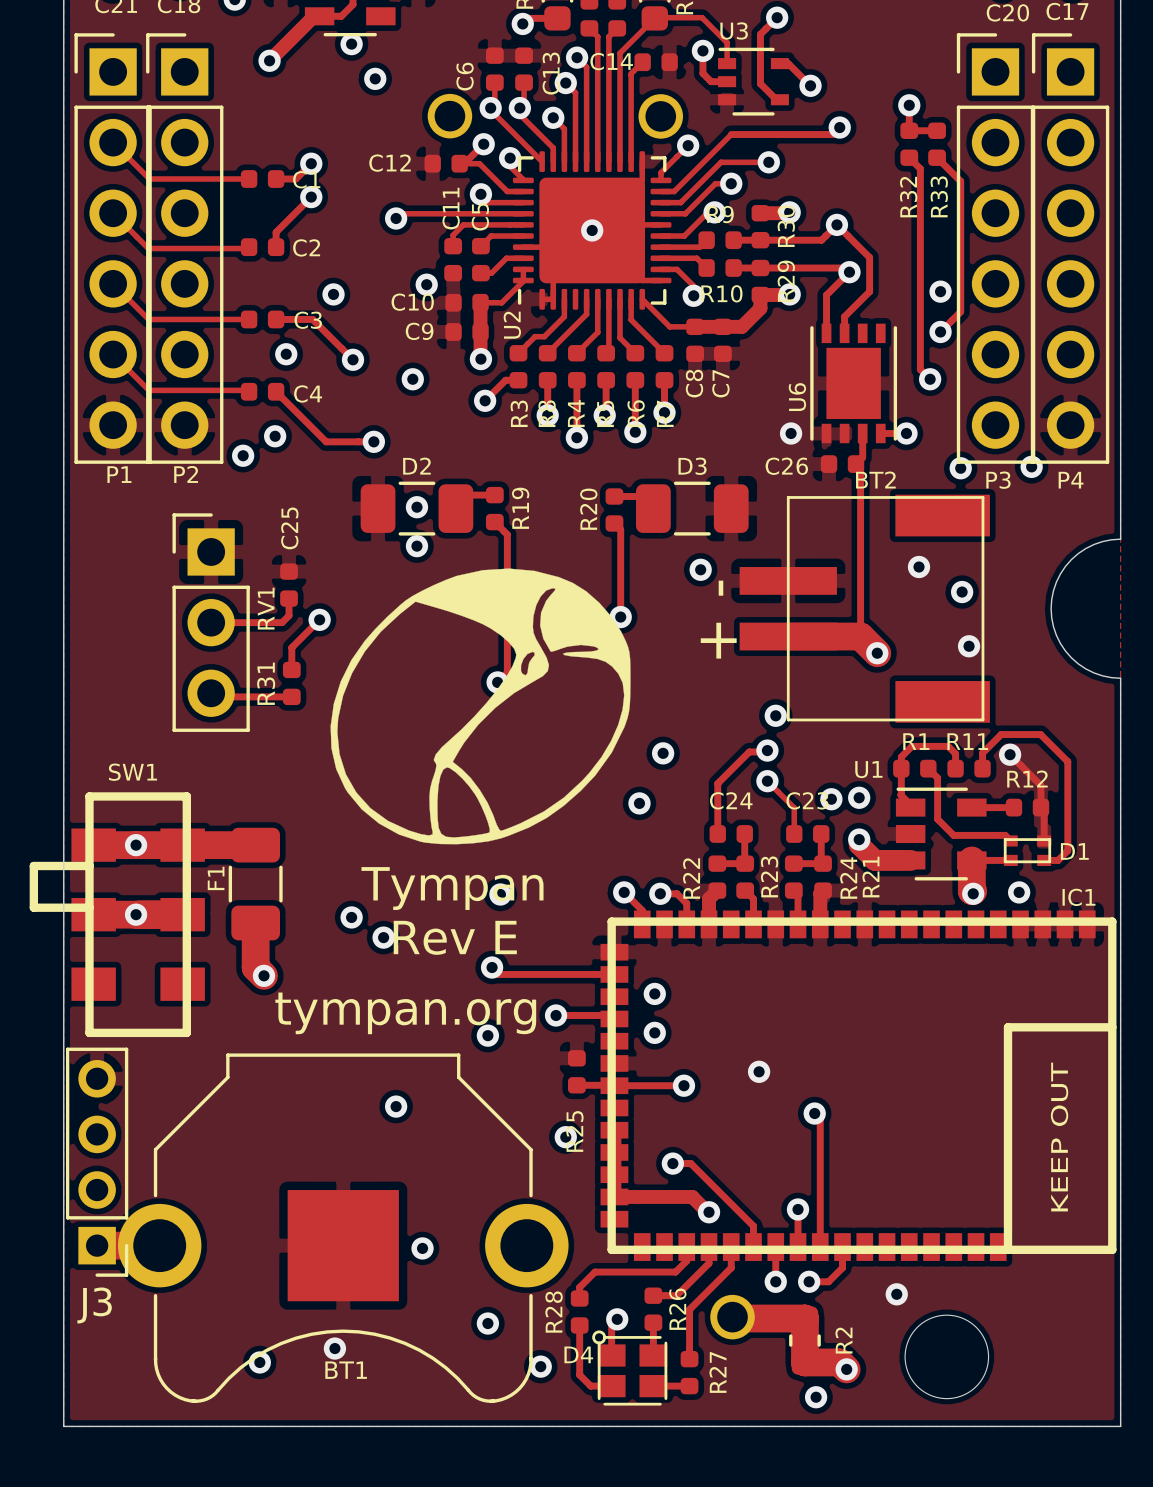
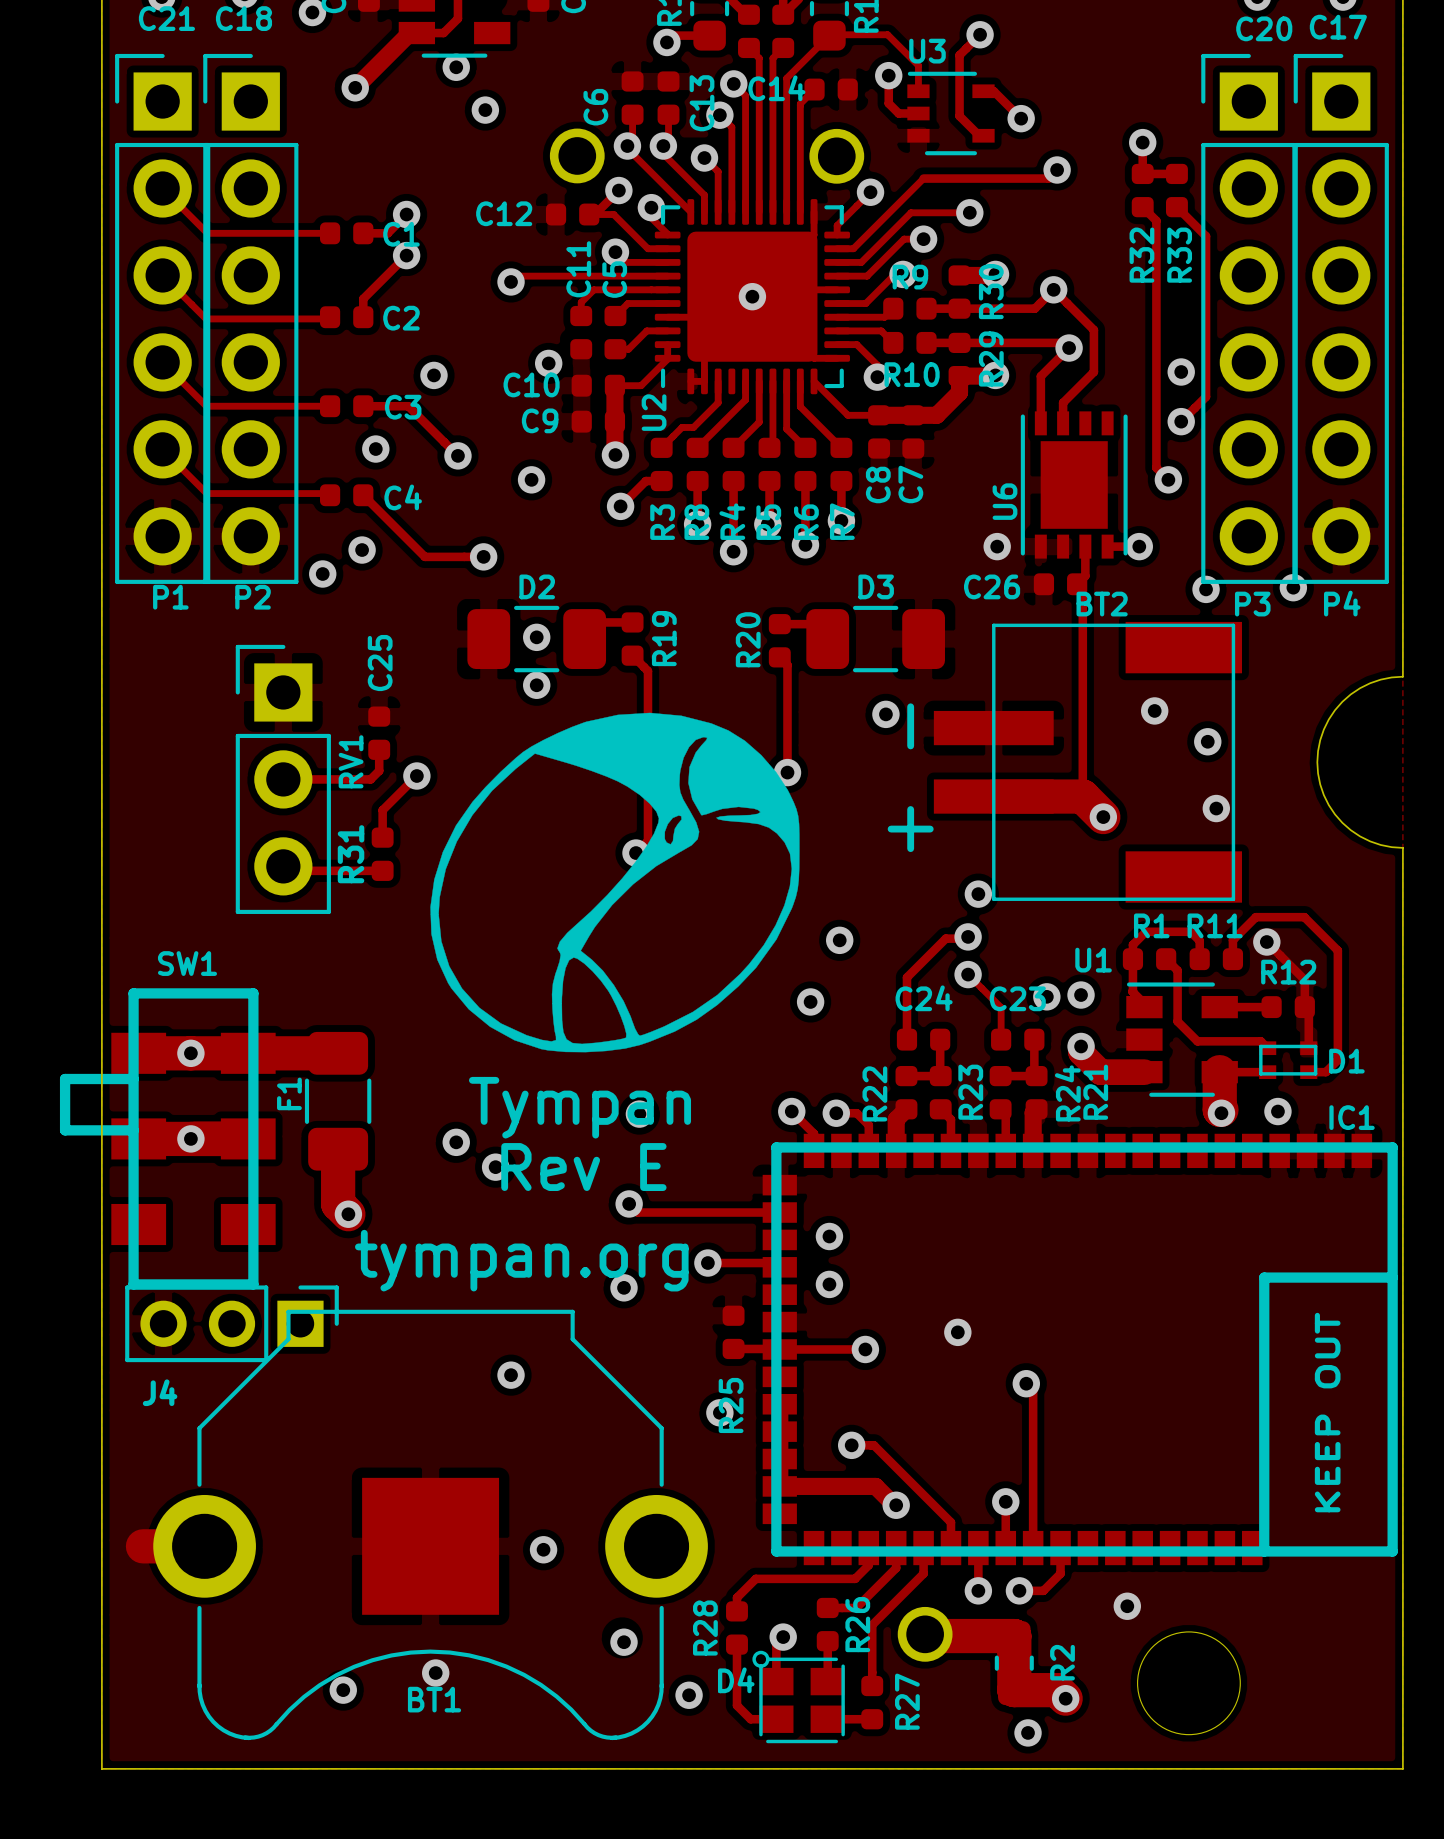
J4: none -> (231, 1323)
J3: (97, 1162) -> none
BT1 position: (343, 1228) -> (430, 1524)

